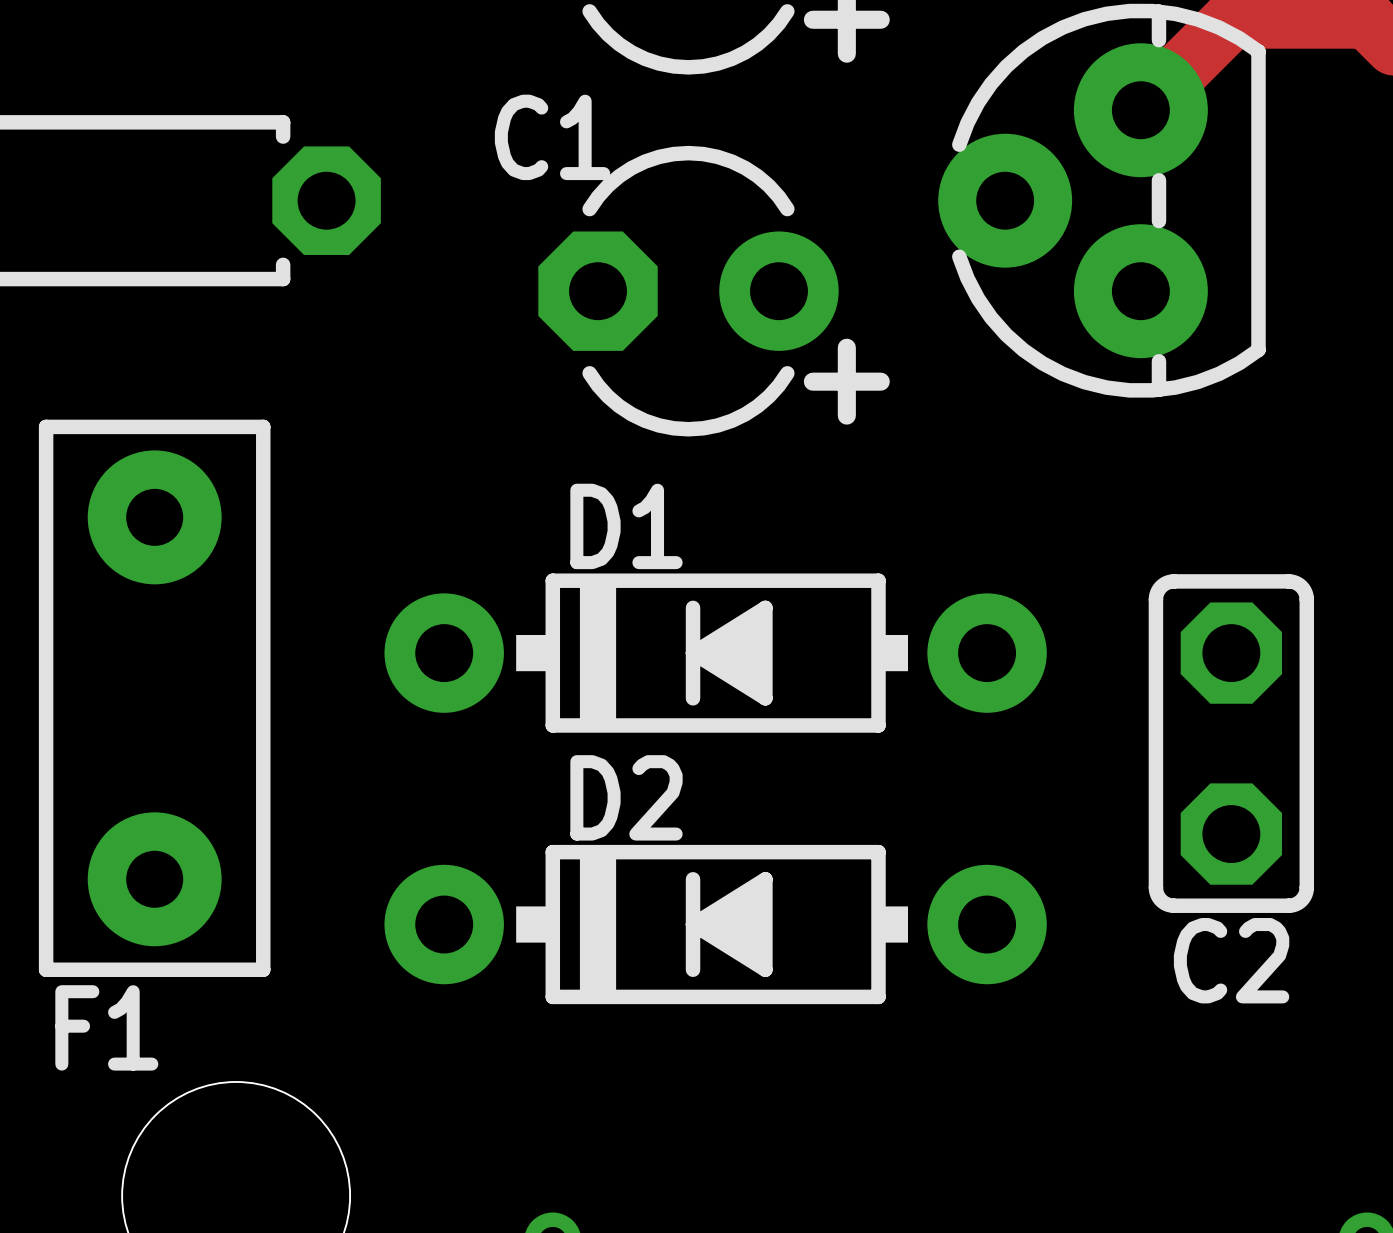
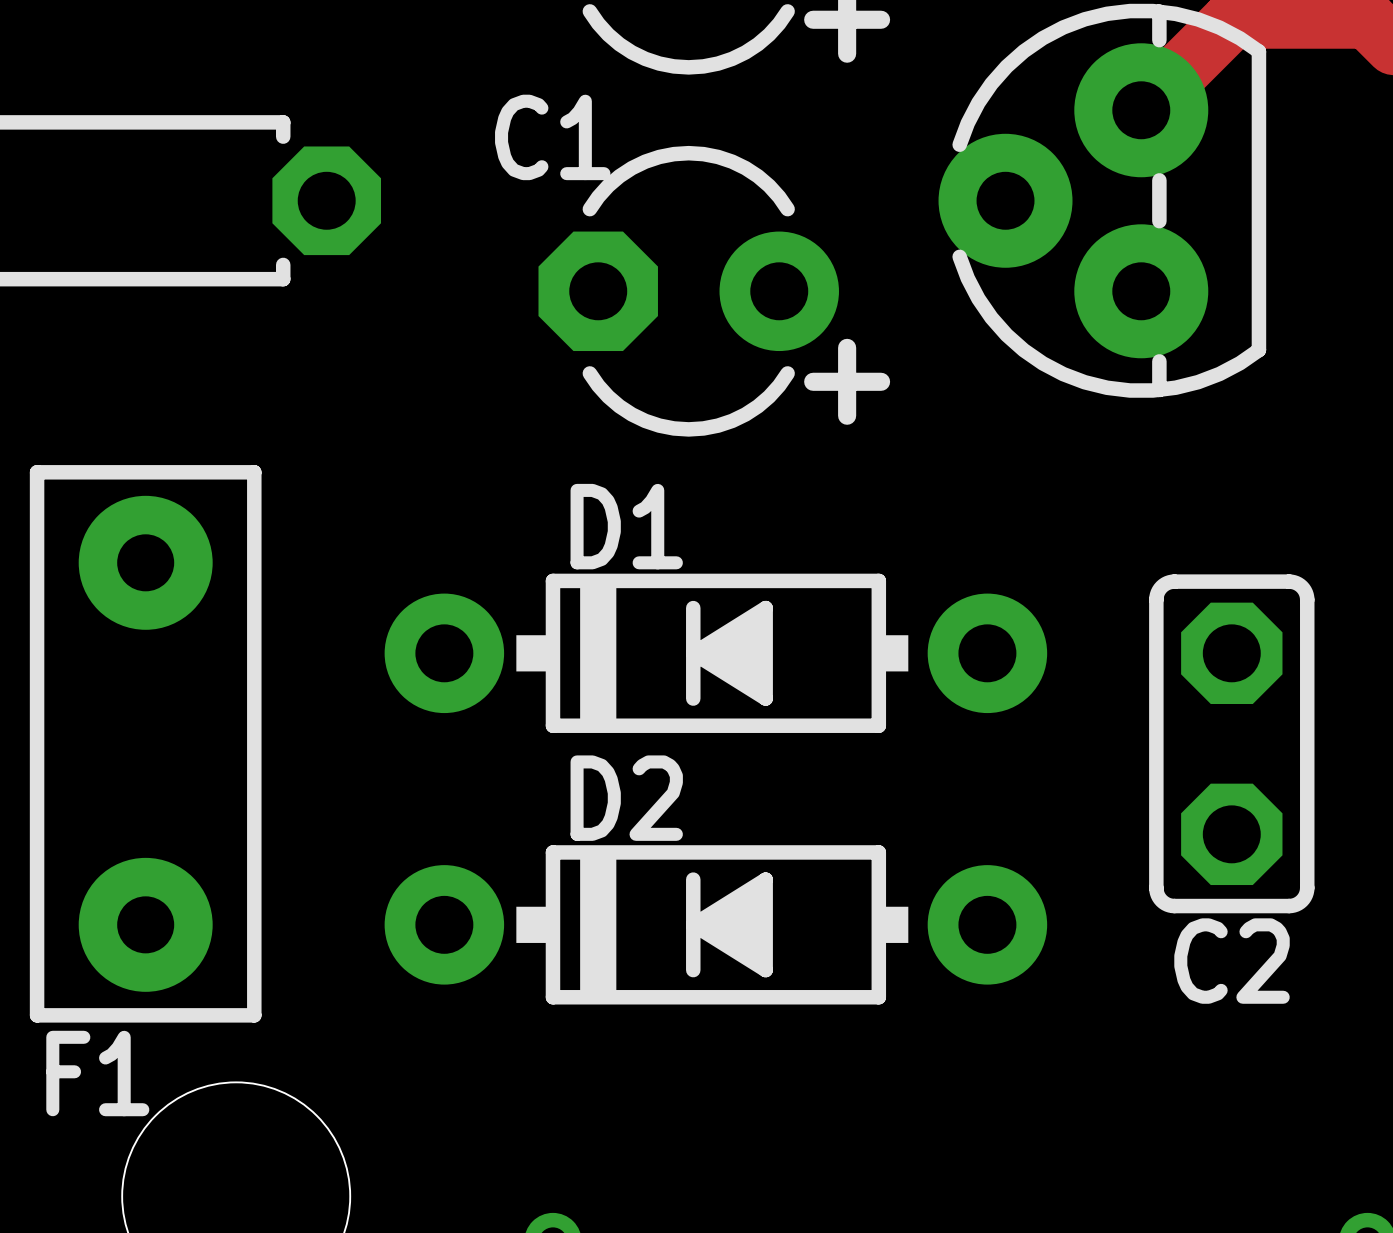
F1 position: (154, 698) -> (145, 743)

